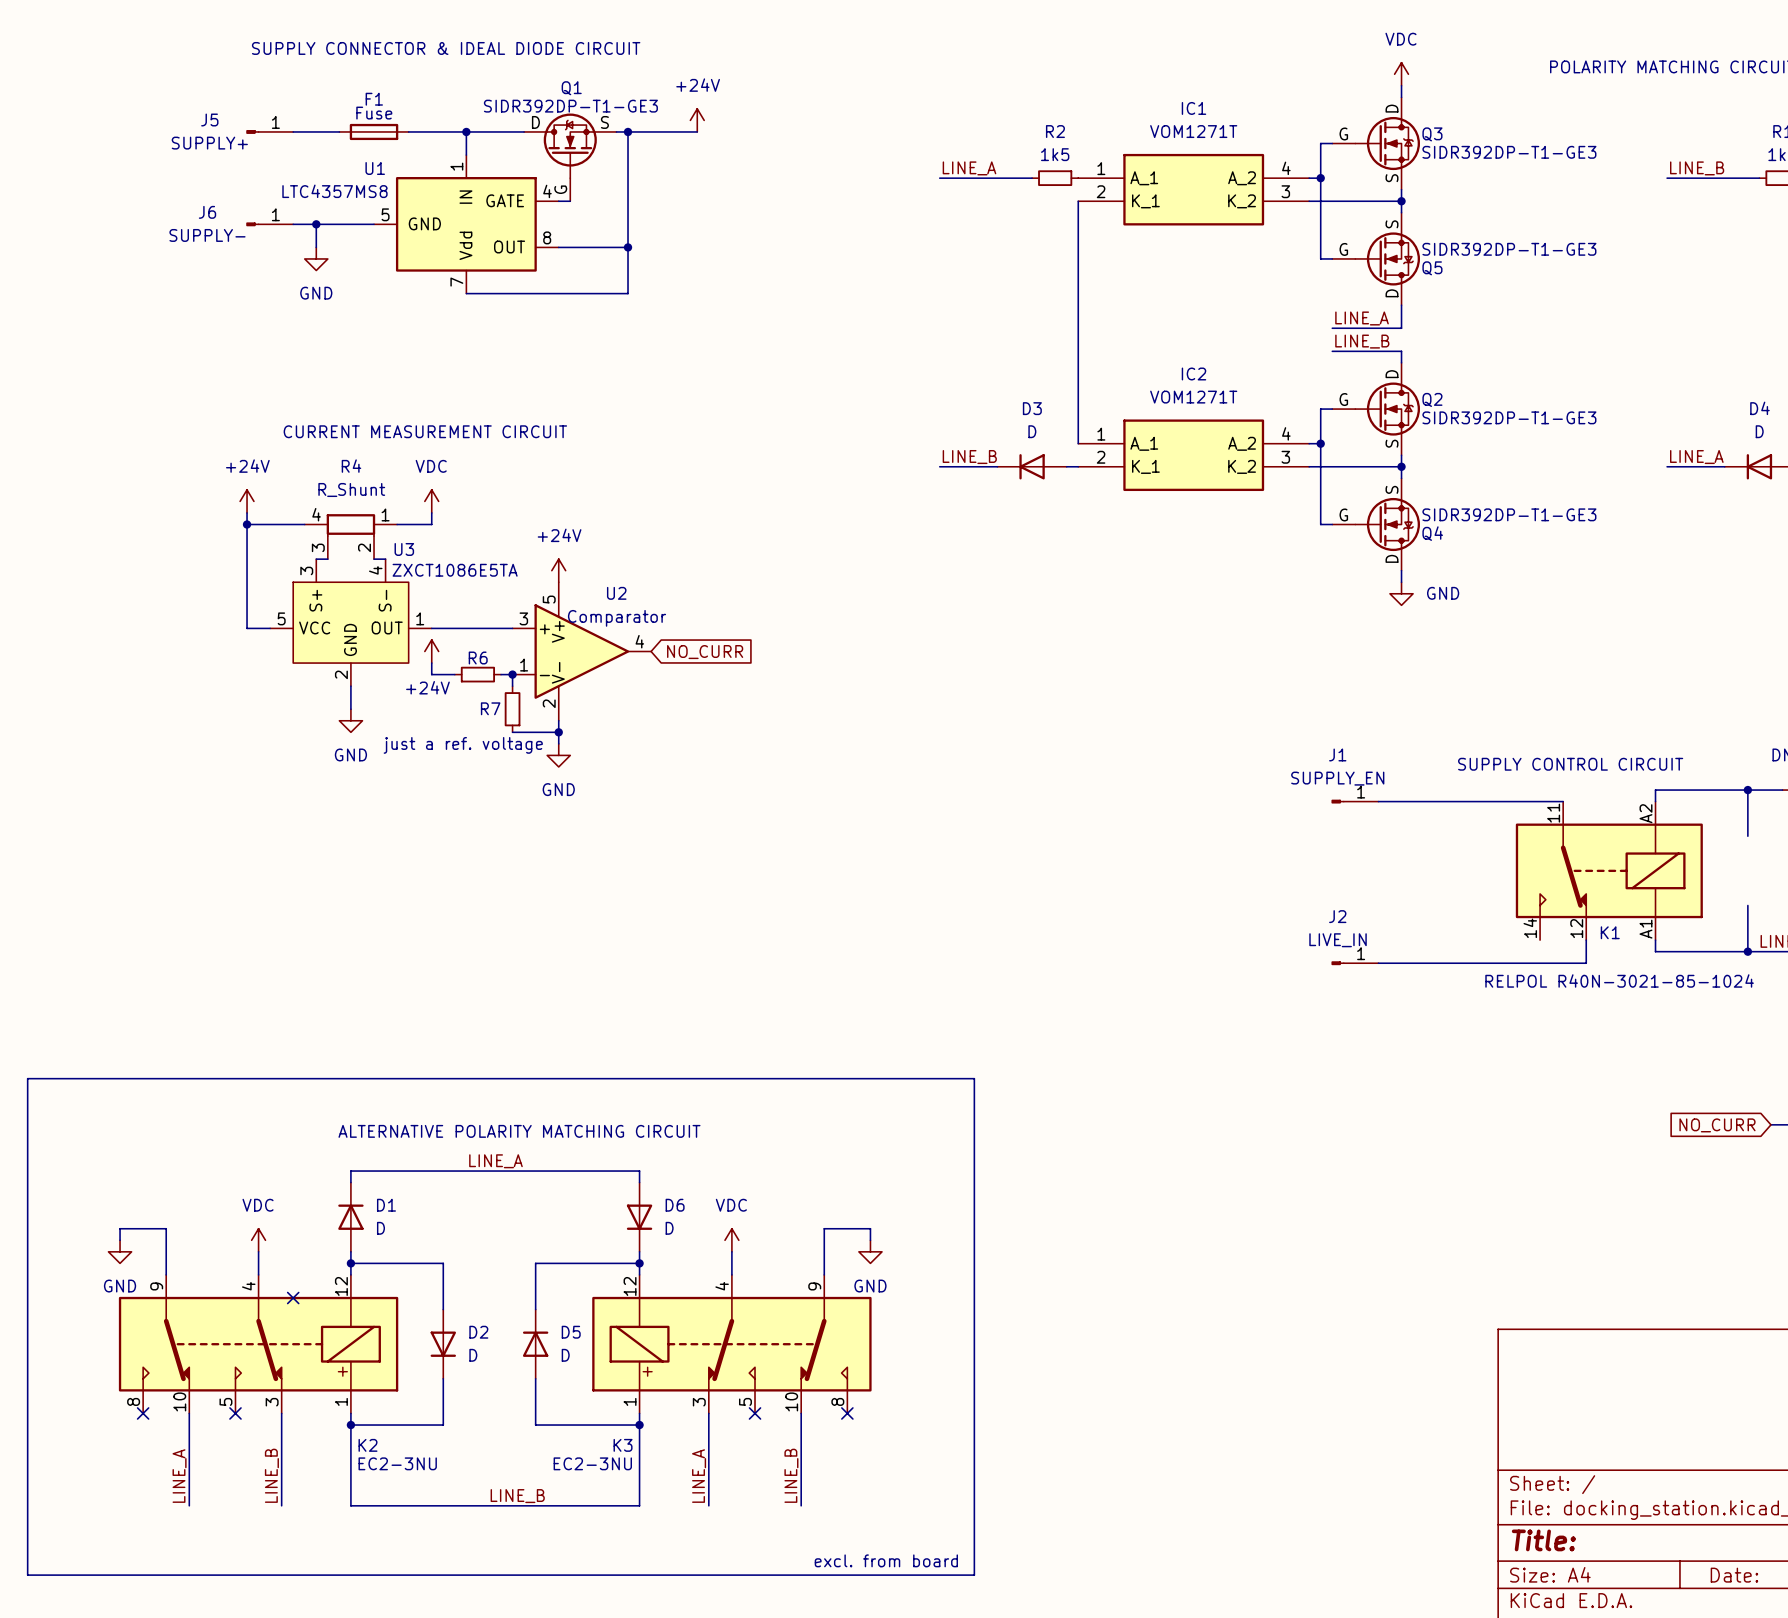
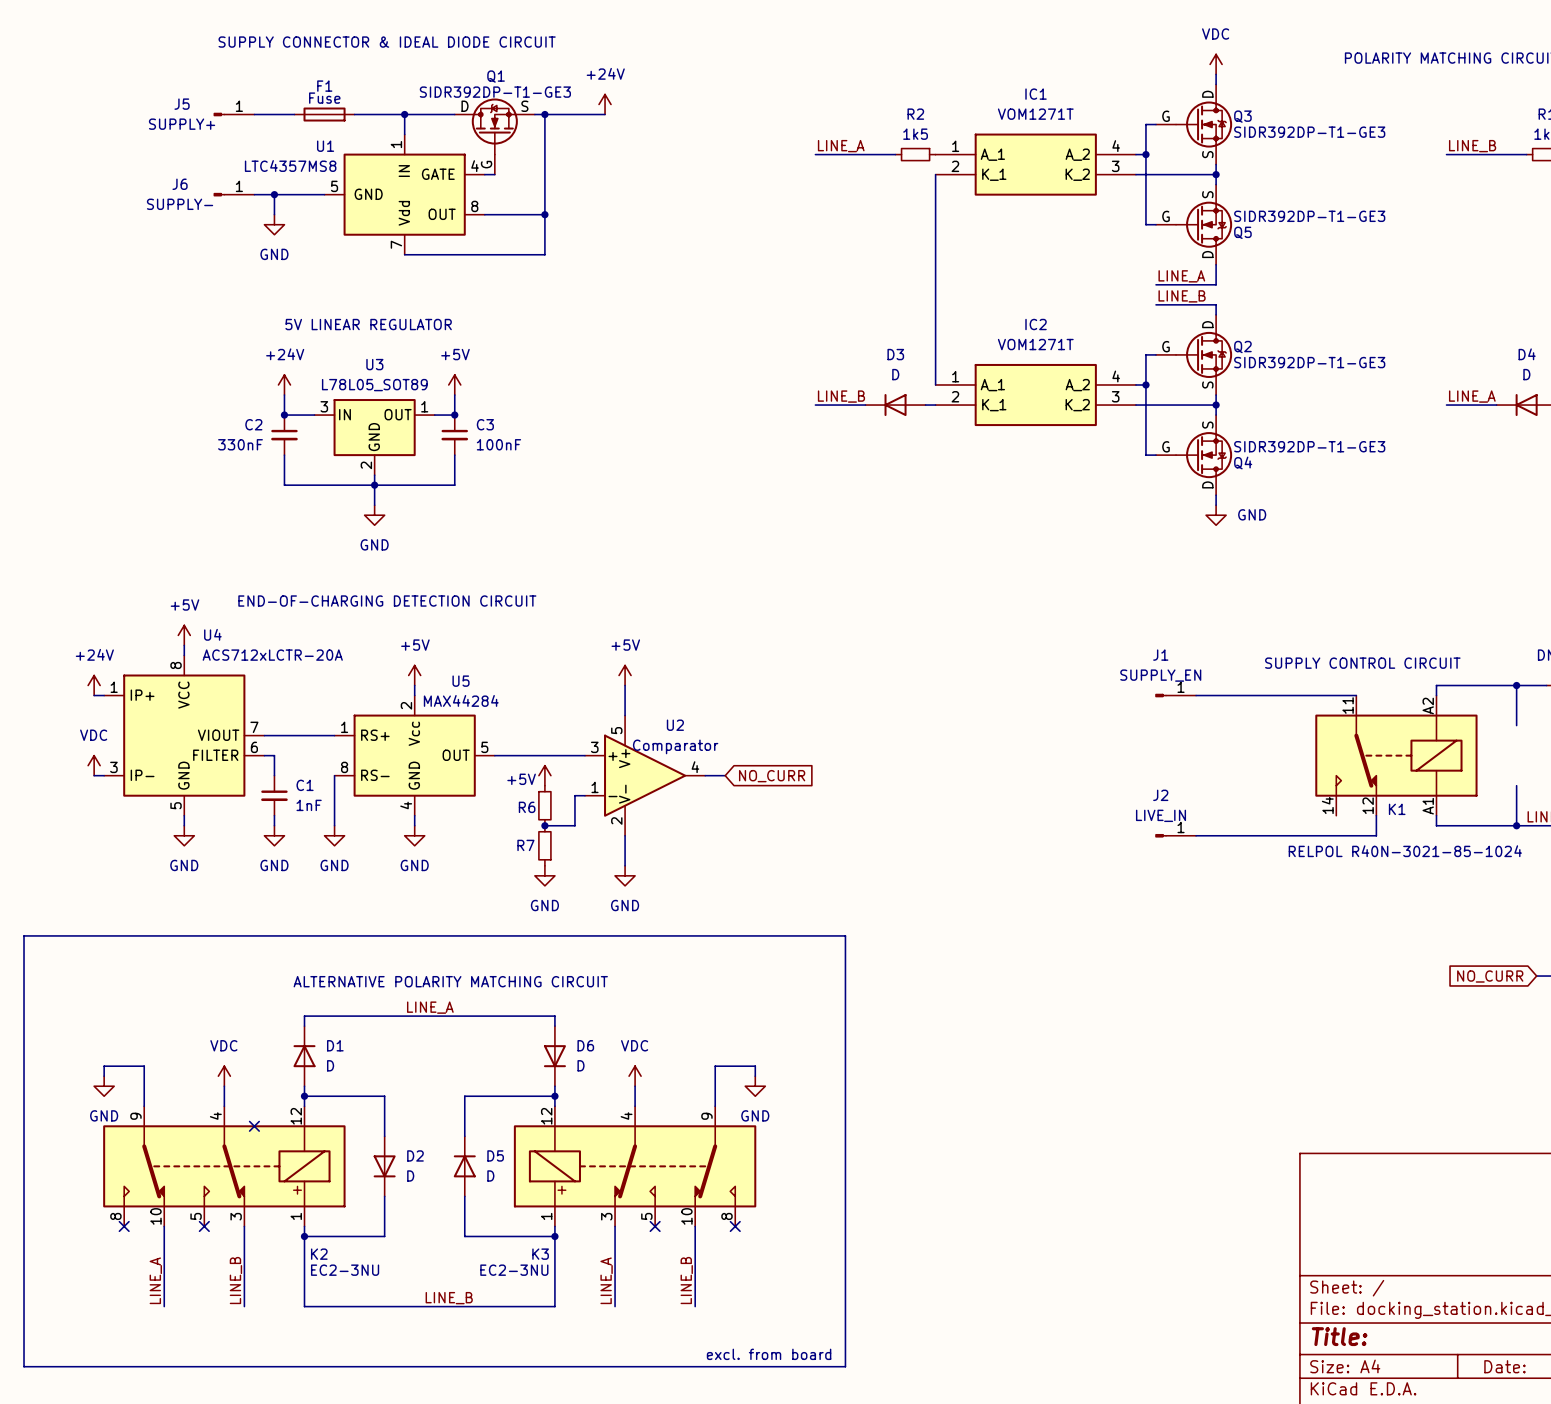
text: none -> 5V LINEAR REGULATOR (368, 324)
text: CURRENT MEASUREMENT CIRCUIT (425, 431) -> none
power symbol: none -> +5V (454, 384)
wire: none -> (284, 395) (284, 415) (314, 415)
wire: none -> (454, 395) (454, 415) (434, 415)
junction: none -> (284, 415)
junction: none -> (454, 415)
power symbol position: +24V (247, 501) -> +24V (284, 384)
C2: none -> 330nF (284, 435)
power symbol: VDC (431, 501) -> none
C3: none -> 100nF (454, 435)
wire: (247, 512) (247, 628) (270, 628) -> none
wire: (247, 524) (304, 524) -> none
junction: (247, 524) -> none
wire: none -> (284, 455) (284, 485) (324, 485)
wire: none -> (454, 455) (454, 485) (334, 485)
R4: R_Shunt (350, 536) -> none
wire: none -> (374, 475) (374, 505)
U3 name position: U3 (404, 549) -> U3 (374, 364)
U3 symbol: [270, 559, 432, 687] -> [314, 399, 435, 476]
wire: (316, 559) (327, 559) -> none
junction: none -> (374, 485)
U3 value: ZXCT1086E5TA (455, 570) -> L78L05_SOT89 (374, 385)
power symbol: +24V (558, 570) -> none
power symbol: none -> GND (374, 515)
wire: (431, 628) (512, 628) -> none
power symbol: +24V (431, 651) -> none
U2 position: (581, 651) -> (645, 775)
global label: NO_CURR (705, 652) -> none
R6 name position: R6 (478, 658) -> R6 (527, 807)
wire: (431, 663) (431, 674) (454, 674) -> none
R6 rotation: 0° (477, 674) -> 90° clockwise (544, 805)
R6 position: (477, 674) -> (544, 805)
wire: (501, 674) (512, 674) (512, 686) -> none
junction: (512, 674) -> none
wire: (350, 686) (350, 709) -> none
text: none -> END-OF-CHARGING DETECTION CIRCUIT (387, 601)
R7 position: (512, 709) -> (544, 845)
power symbol: GND (350, 720) -> none
wire: (558, 720) (558, 743) -> none
power symbol: none -> +5V (184, 635)
wire: (512, 732) (558, 732) -> none
junction: (558, 732) -> none
wire: none -> (184, 645) (184, 655)
text: just a ref. voltage (463, 745) -> none
power symbol: GND (558, 755) -> none
power symbol: none -> +5V (414, 675)
power symbol: none -> +5V (625, 675)
power symbol: none -> +24V (94, 685)
wire: none -> (414, 685) (414, 695)
wire: none -> (625, 685) (625, 715)
wire: none -> (94, 695) (104, 695)
U4: none -> ACS712xLCTR-20A (184, 735)
wire: none -> (264, 735) (334, 735)
wire: none -> (264, 755) (274, 755) (274, 775)
U5: none -> MAX44284 (414, 755)
wire: none -> (494, 755) (584, 755)
power symbol: none -> VDC (94, 765)
wire: none -> (94, 775) (104, 775)
wire: none -> (334, 775) (334, 825)
power symbol: none -> +5V (544, 775)
wire: none -> (705, 775) (725, 775)
global label: none -> NO_CURR (772, 776)
C1: none -> 1nF (274, 795)
wire: none -> (584, 795) (574, 795) (574, 825) (544, 825)
wire: none -> (184, 815) (184, 825)
wire: none -> (274, 815) (274, 825)
wire: none -> (414, 815) (414, 825)
junction: none -> (544, 825)
power symbol: none -> GND (184, 835)
power symbol: none -> GND (274, 835)
power symbol: none -> GND (334, 835)
power symbol: none -> GND (414, 835)
wire: none -> (625, 835) (625, 865)
power symbol: none -> GND (544, 875)
power symbol: none -> GND (625, 875)

